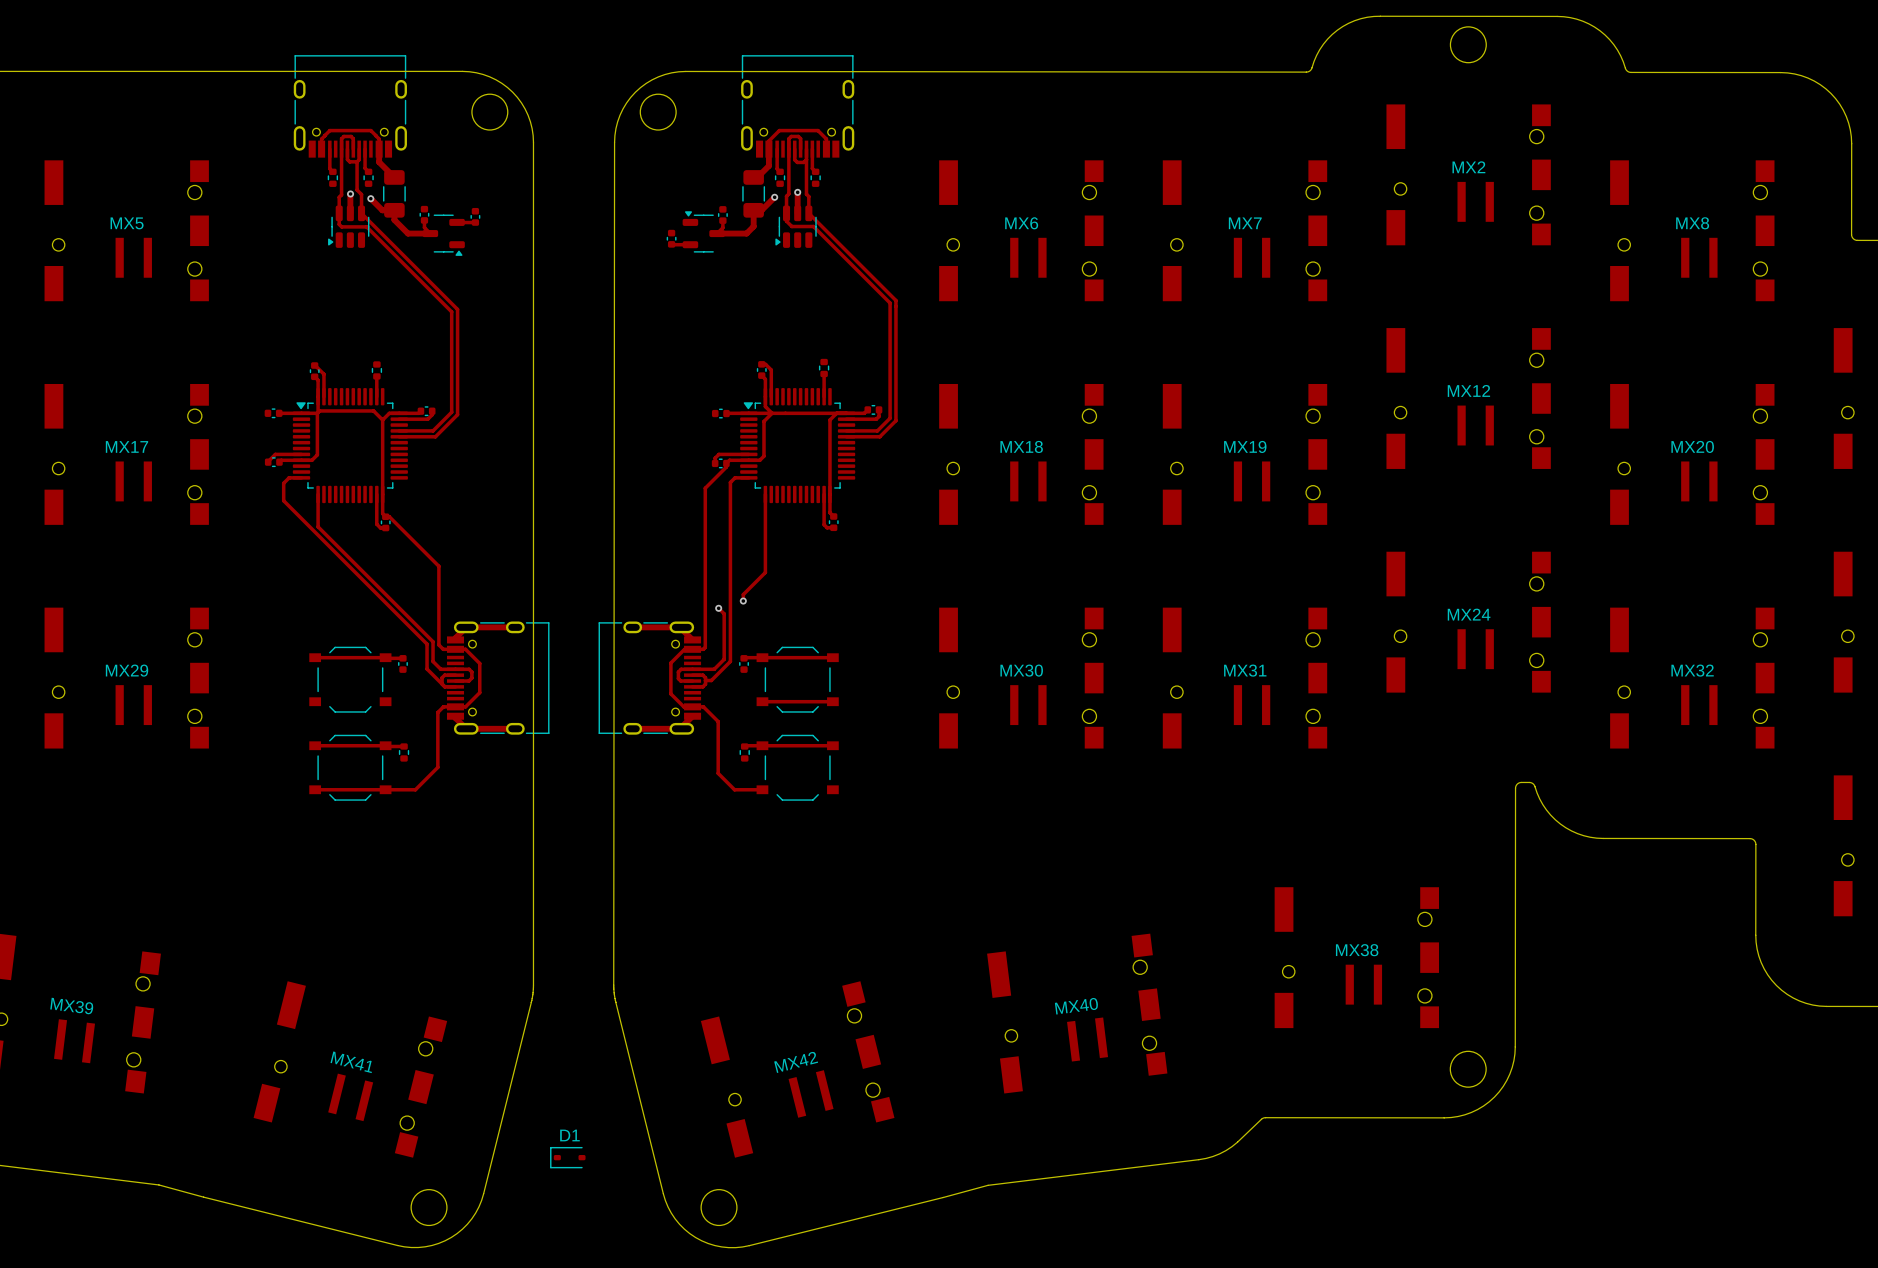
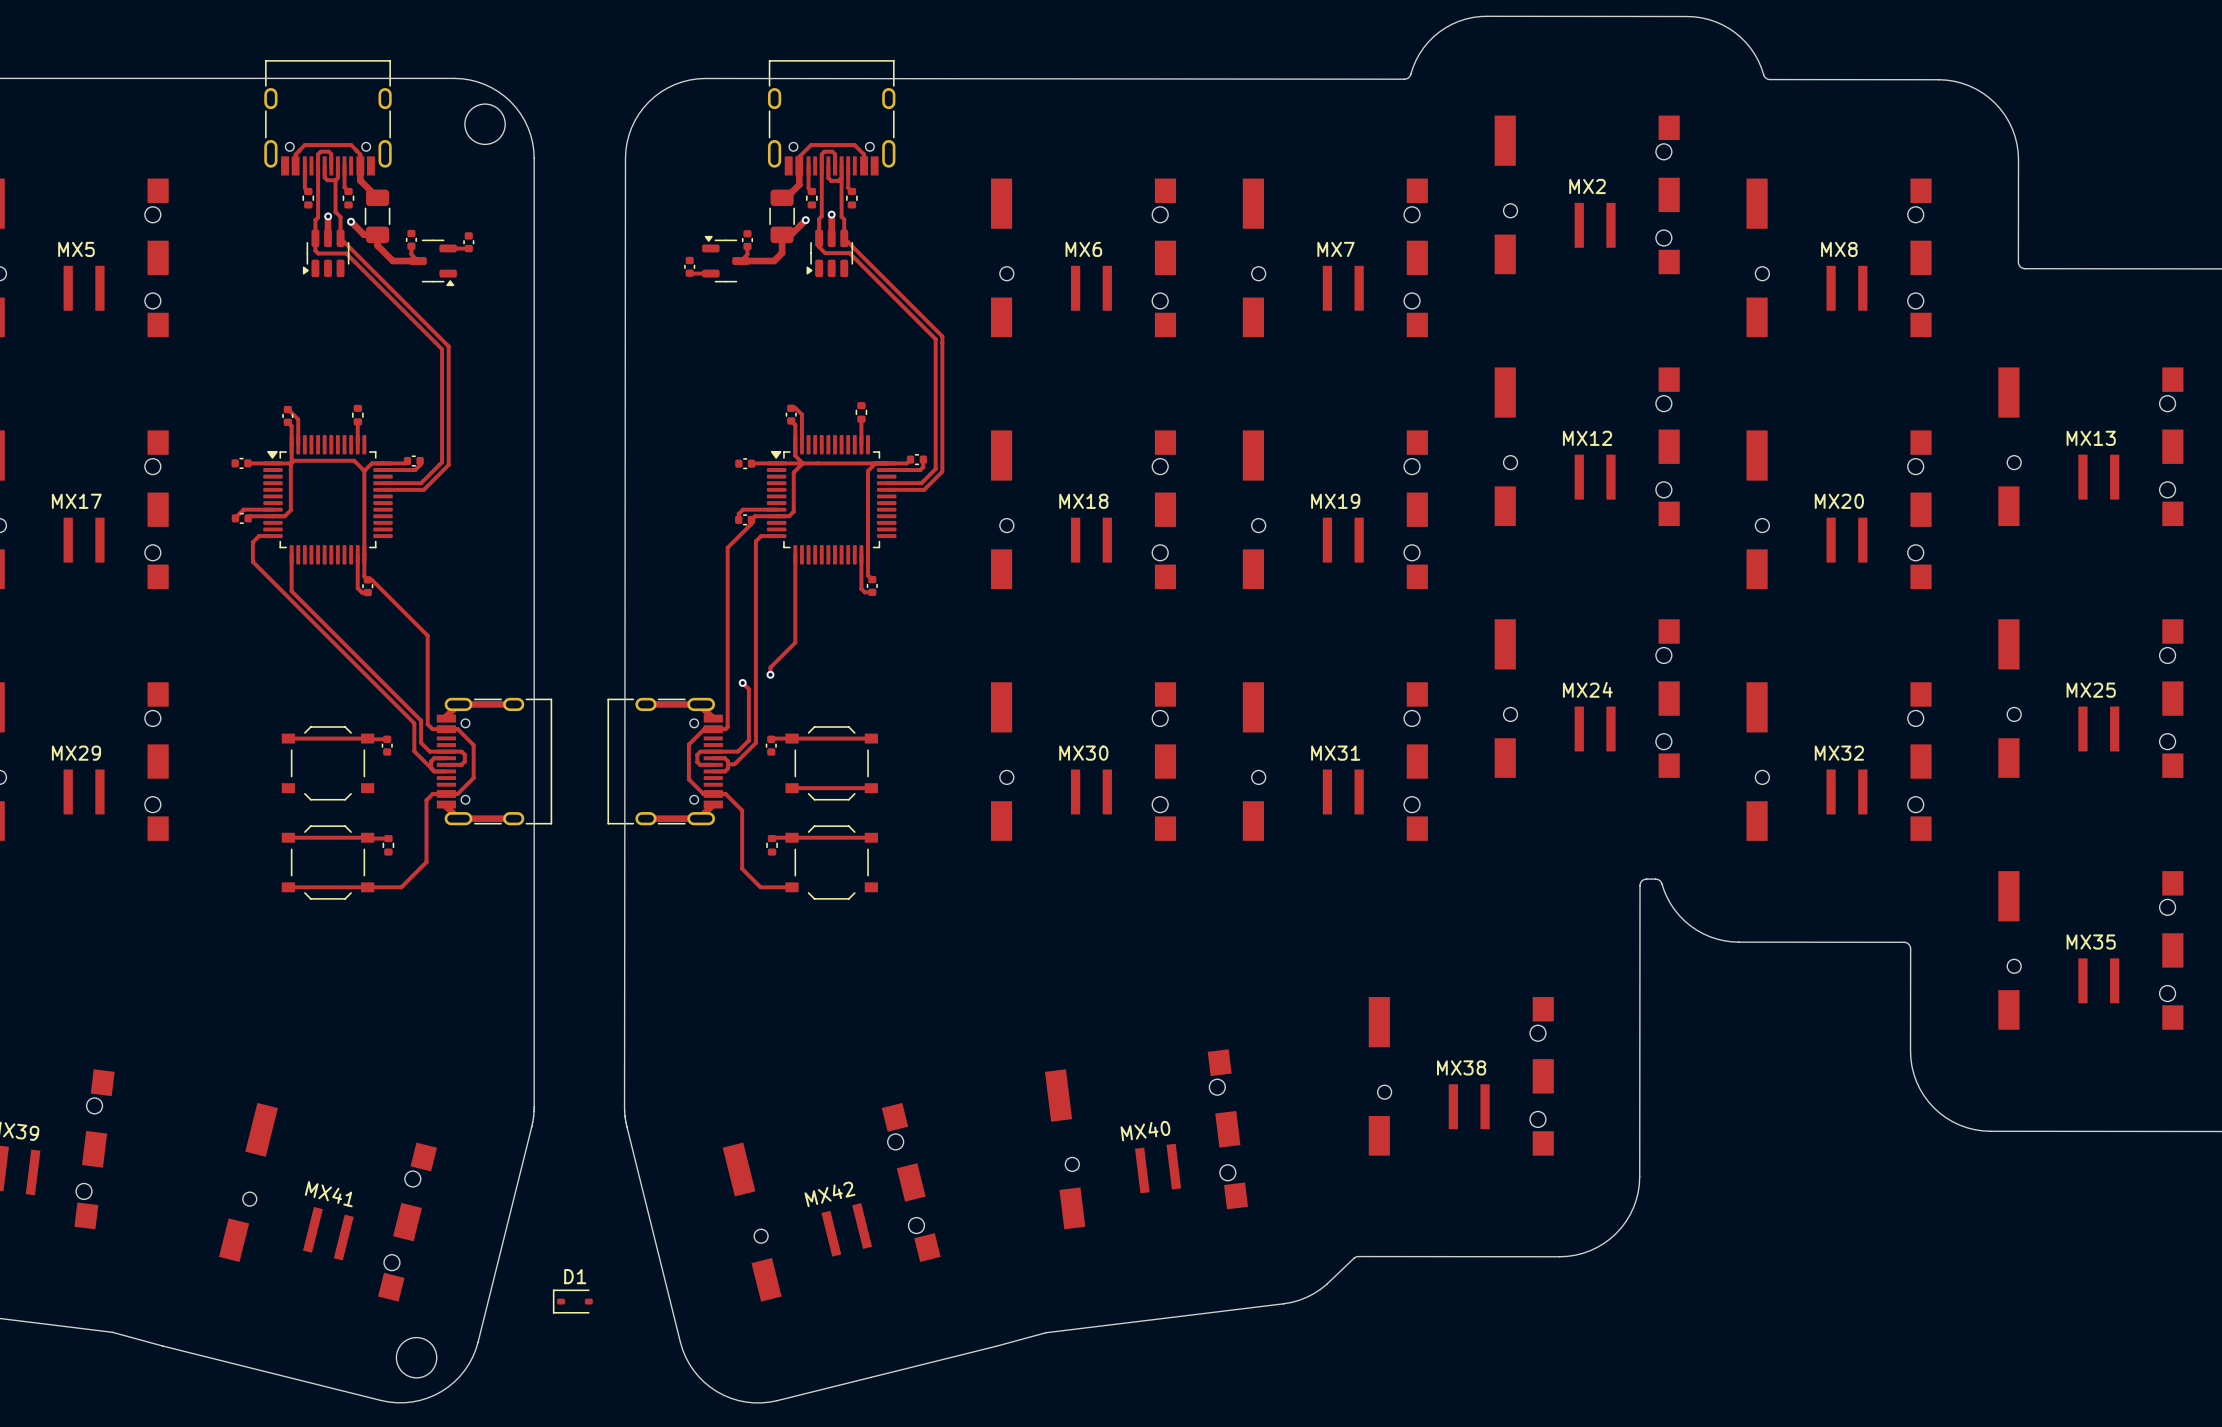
round board edge: [1450, 26, 1487, 63] -> none
round board edge: [640, 93, 677, 131] -> none
round board edge: [1450, 1051, 1487, 1088] -> none
round board edge: [700, 1189, 738, 1226] -> none

